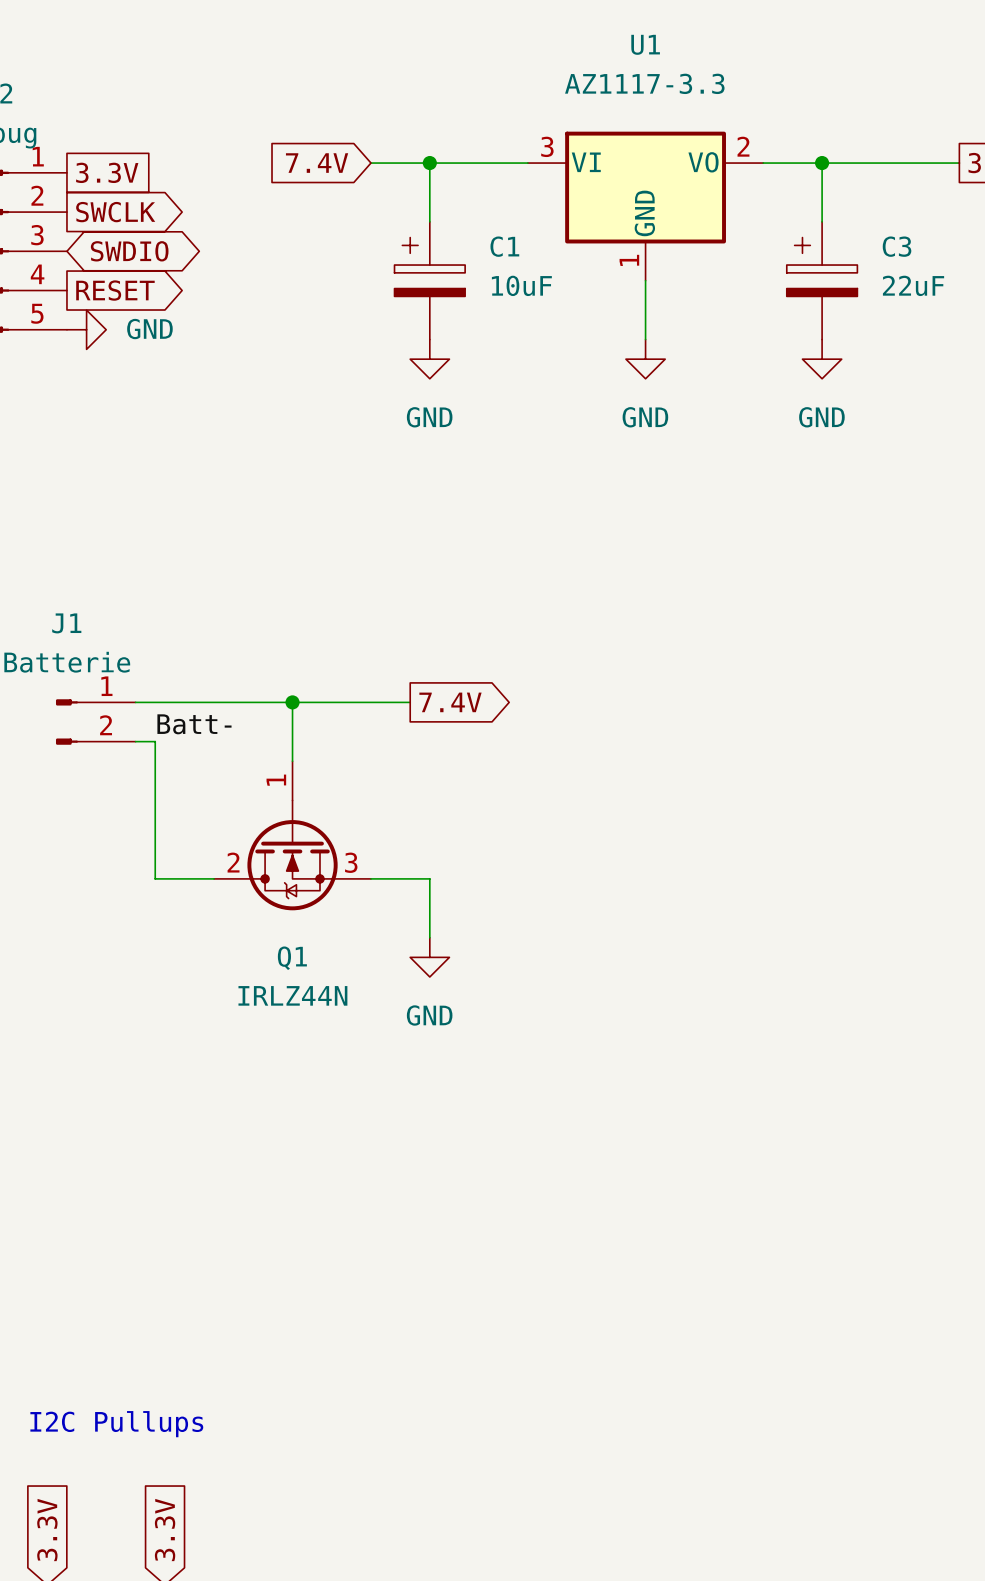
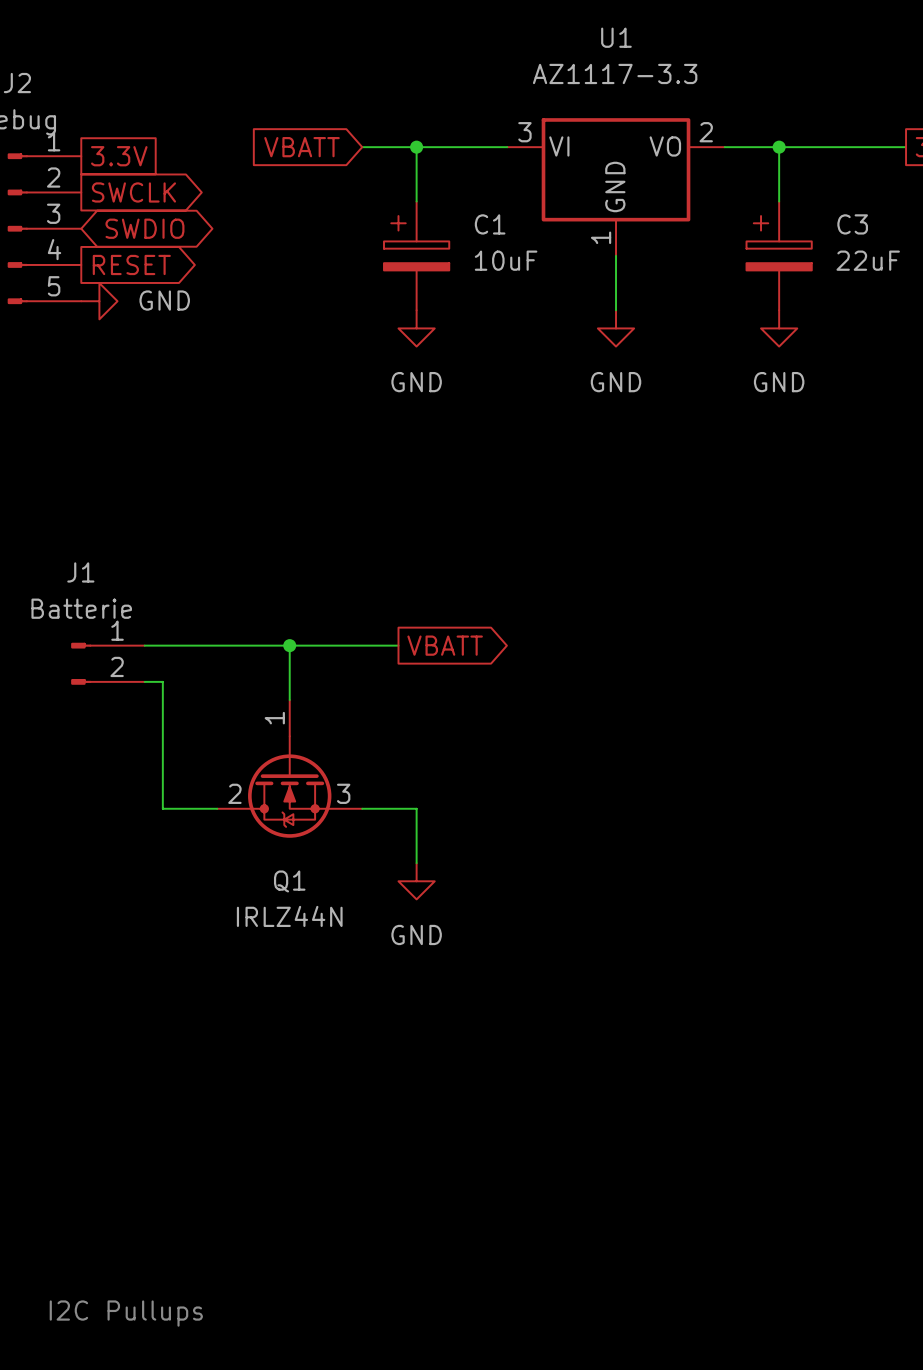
global label: 7.4V (317, 163) -> VBATT (302, 147)
global label: 7.4V (450, 702) -> VBATT (445, 645)
label: Batt- (194, 724) -> none

